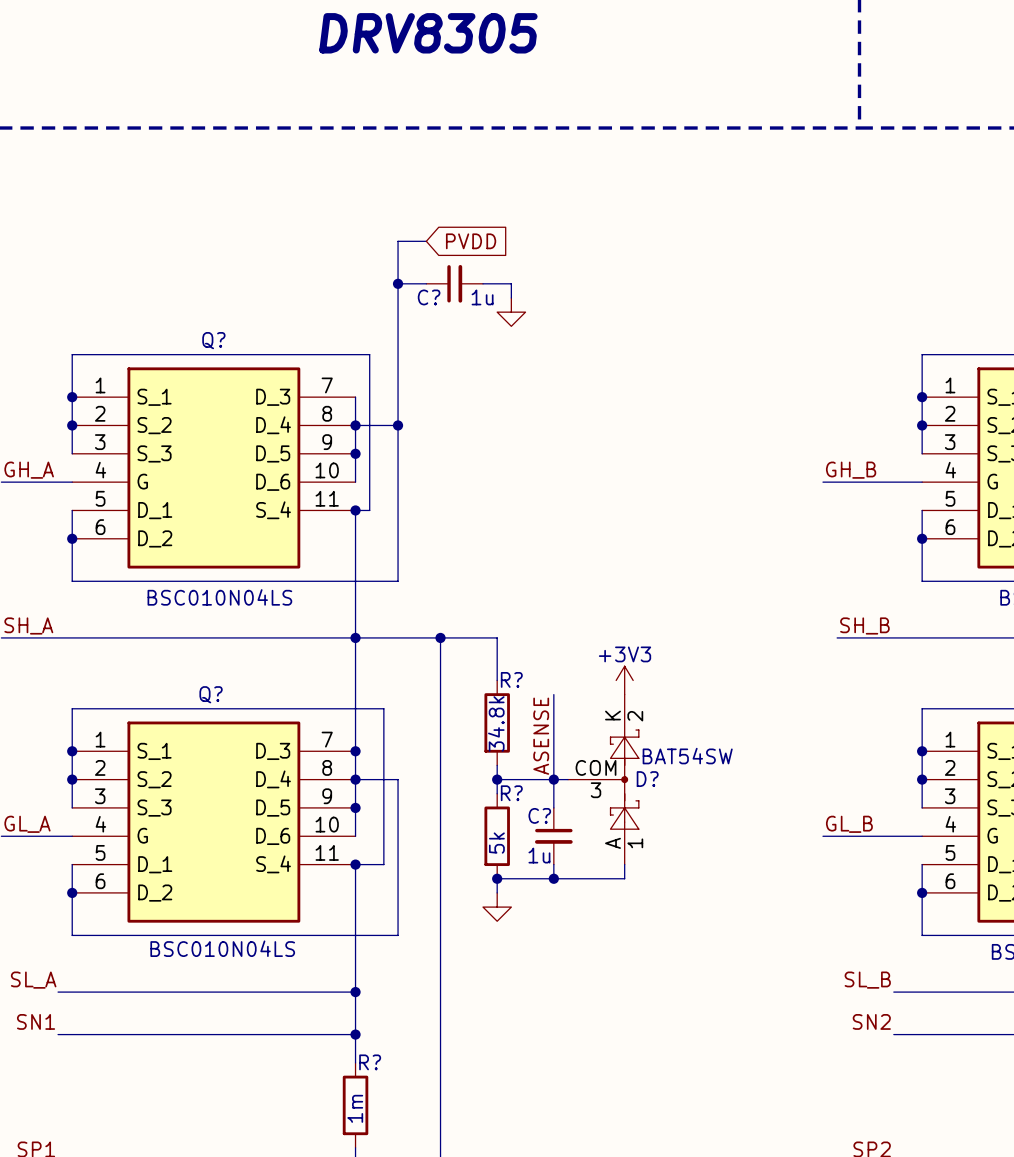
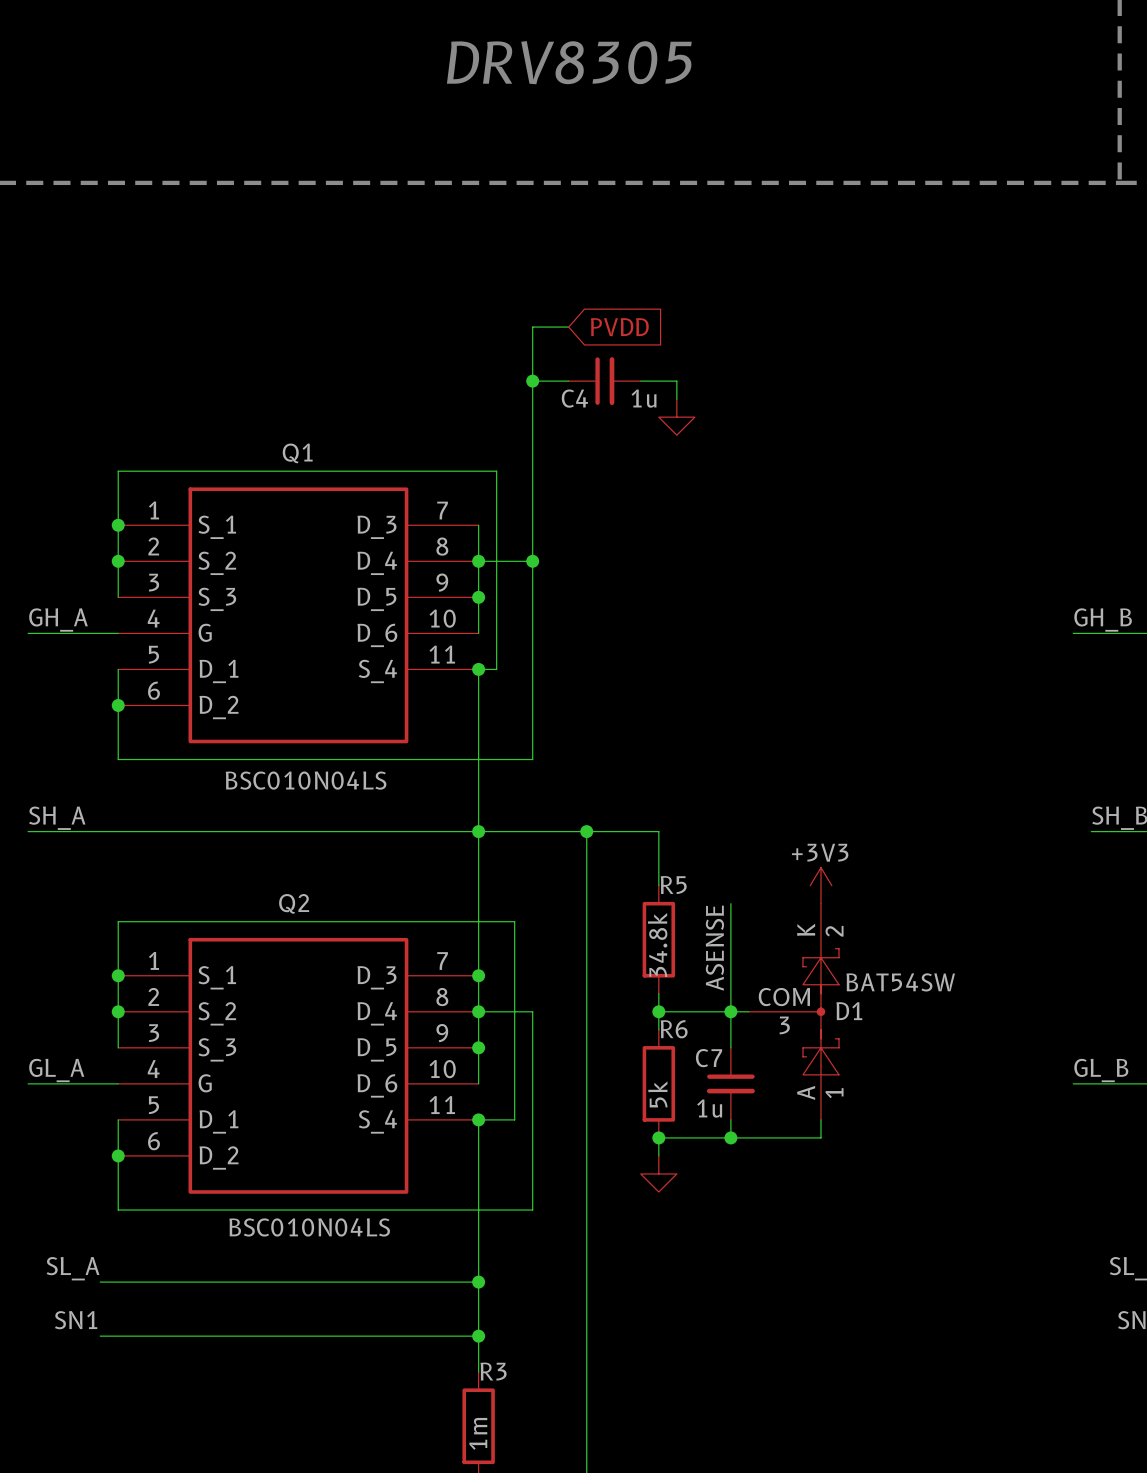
C? name: C? (429, 297) -> C4 (574, 398)
Q? name: Q? (213, 340) -> Q1 (297, 453)
R? name: R? (511, 679) -> R5 (673, 885)
Q? name: Q? (211, 694) -> Q2 (294, 903)
D? name: D? (647, 779) -> D1 (849, 1011)
R? name: R? (511, 793) -> R6 (674, 1029)
C? name: C? (539, 815) -> C7 (709, 1058)
R? name: R? (370, 1062) -> R3 (493, 1371)

